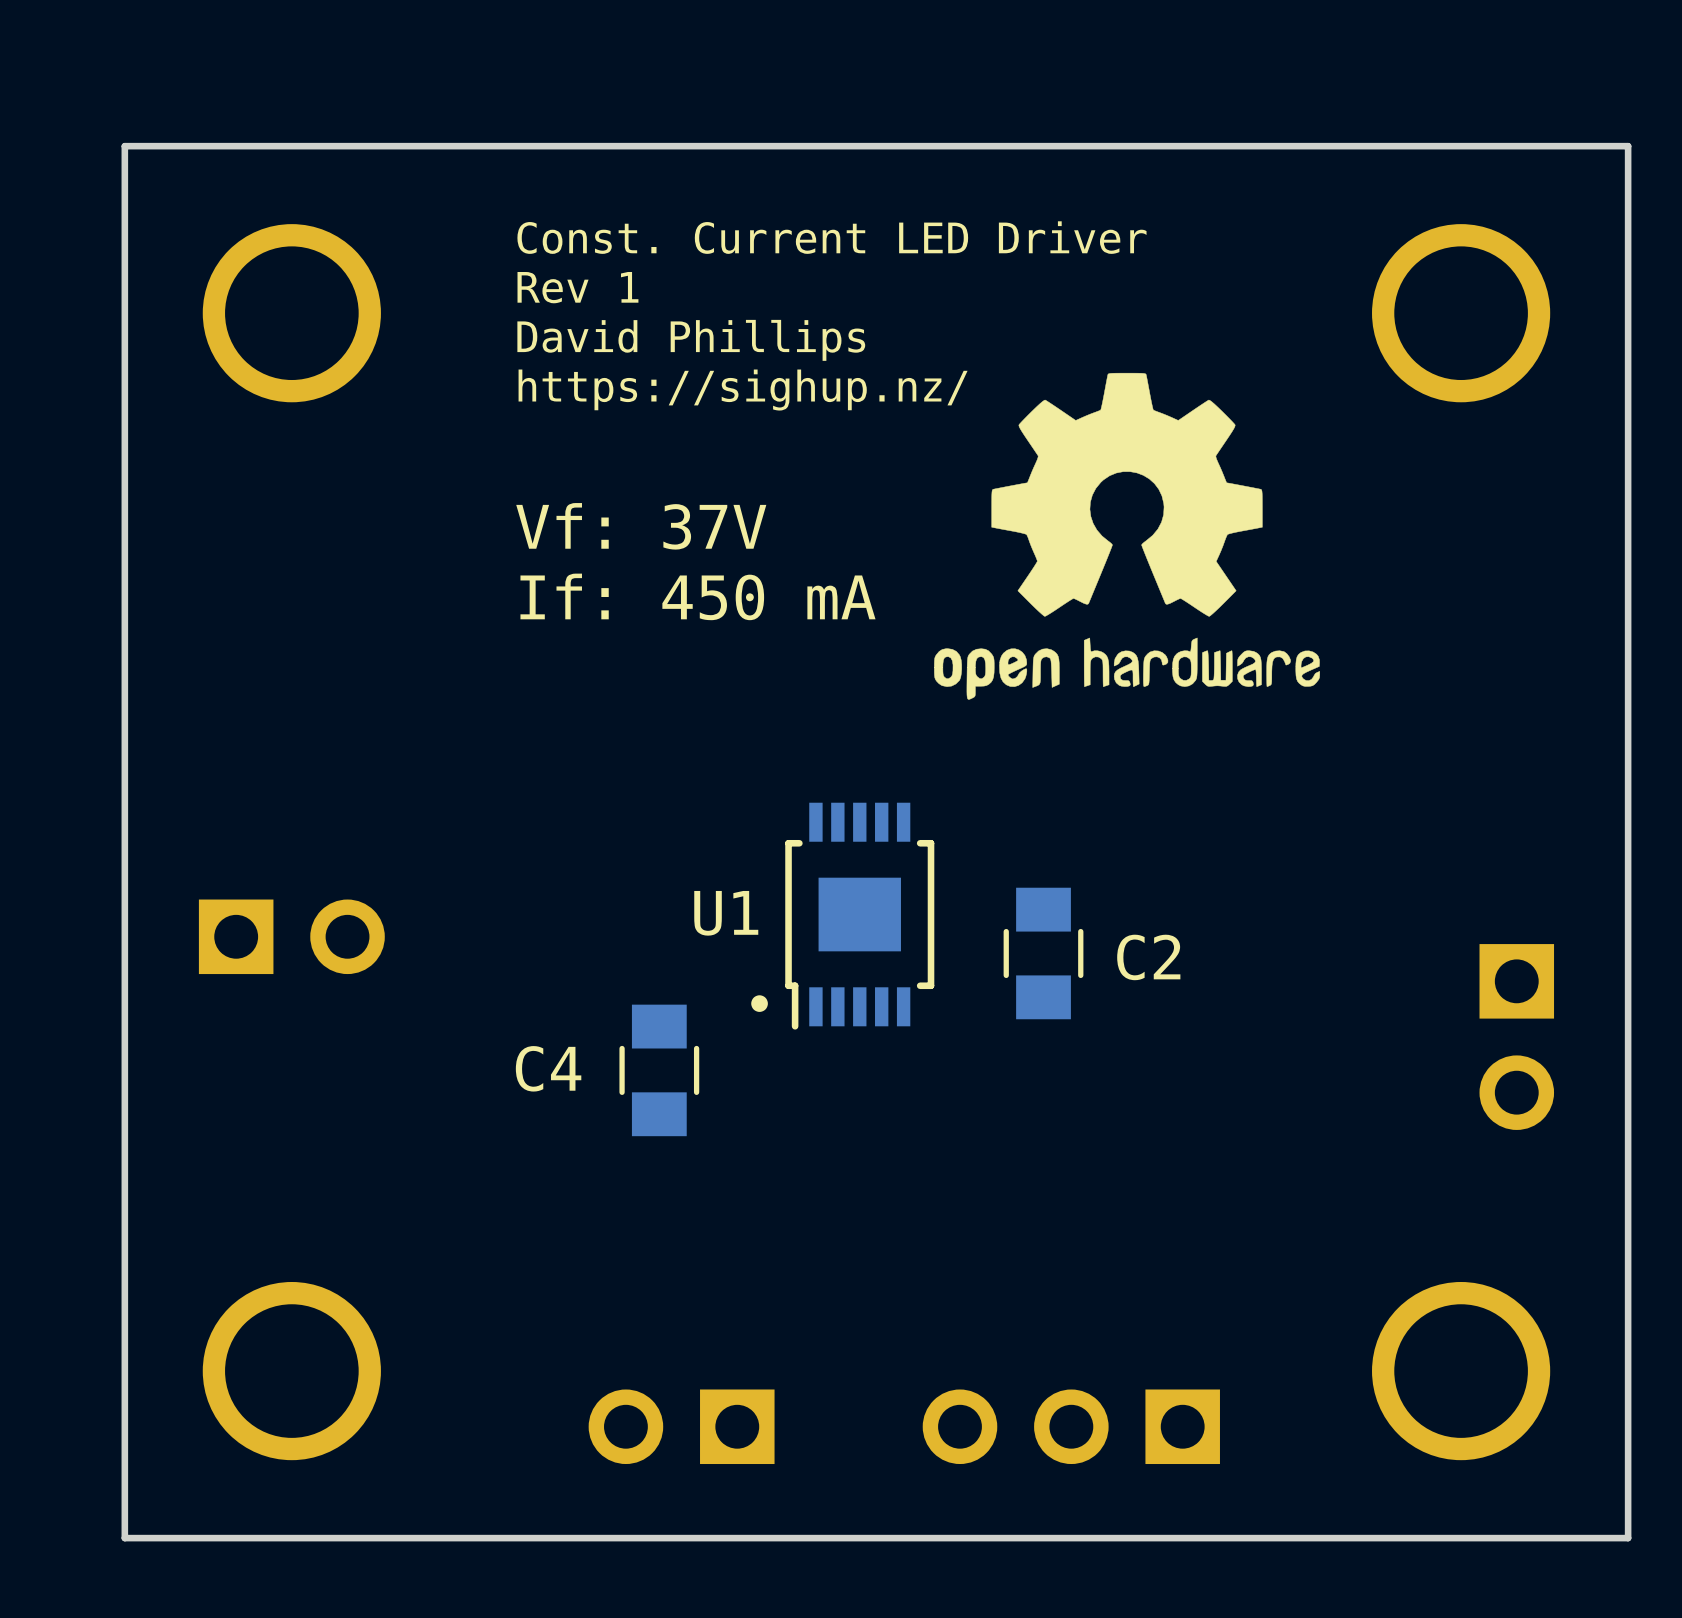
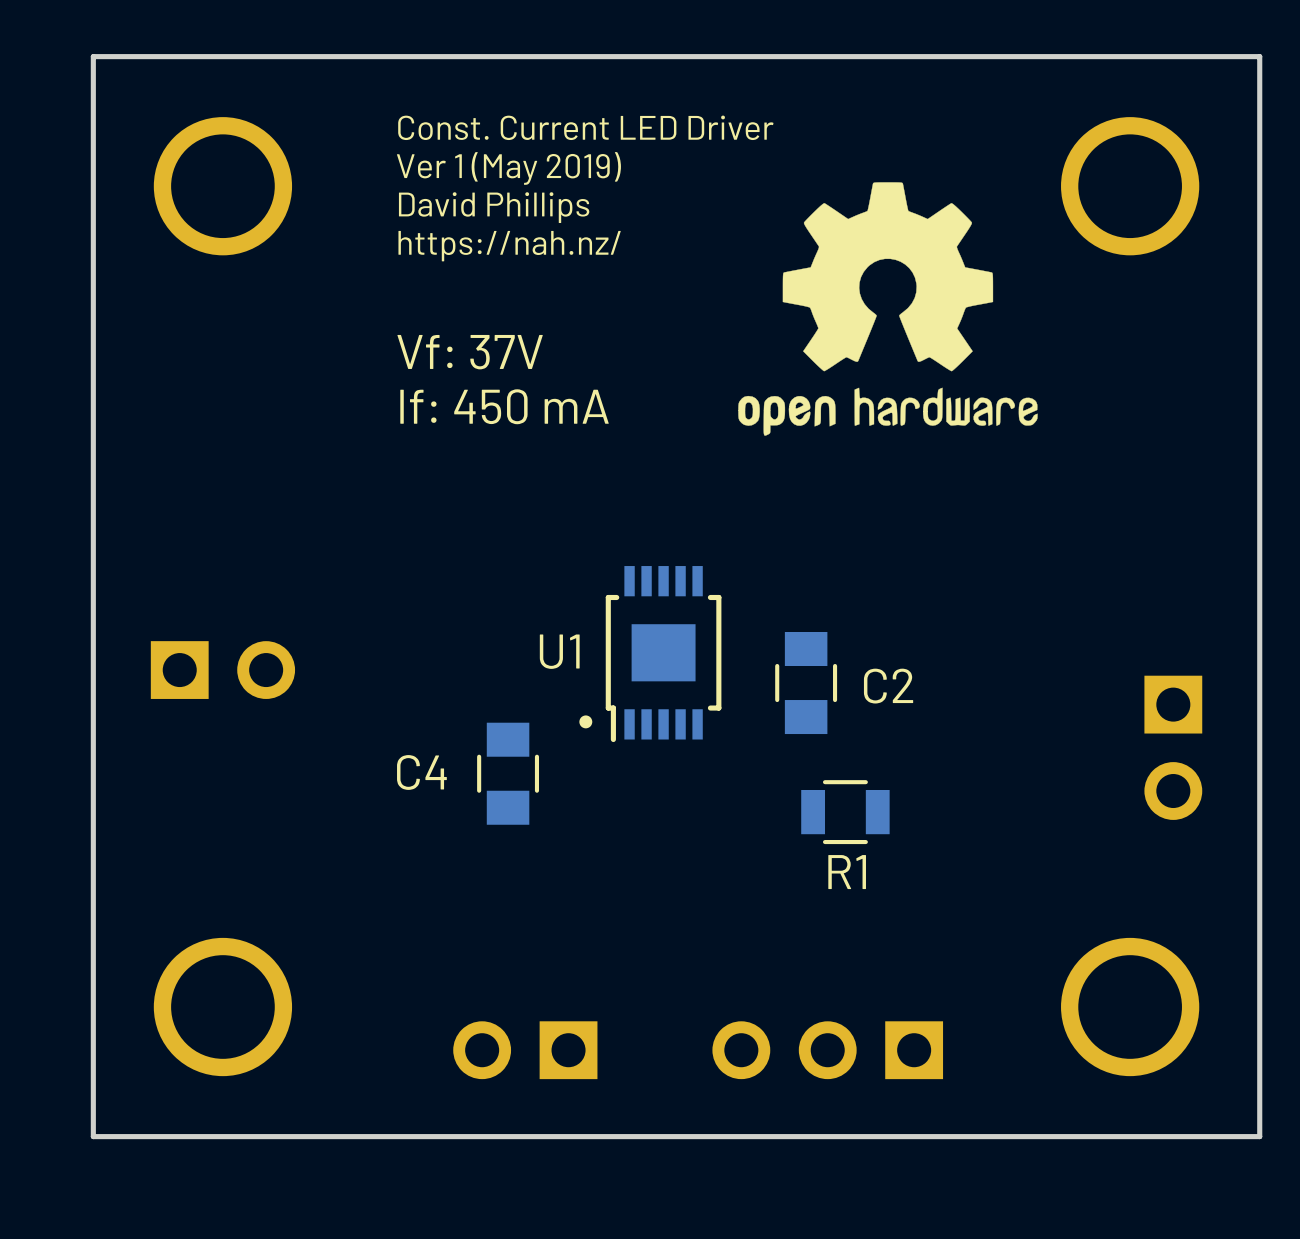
text: Rev 1 (577, 287) -> Ver 1 (May 2019) (508, 168)
text: https://sighup.nz/ (743, 390) -> https://nah.nz/ (509, 246)
drawing position: (1127, 536) -> (887, 308)
R1: none -> (845, 812)

